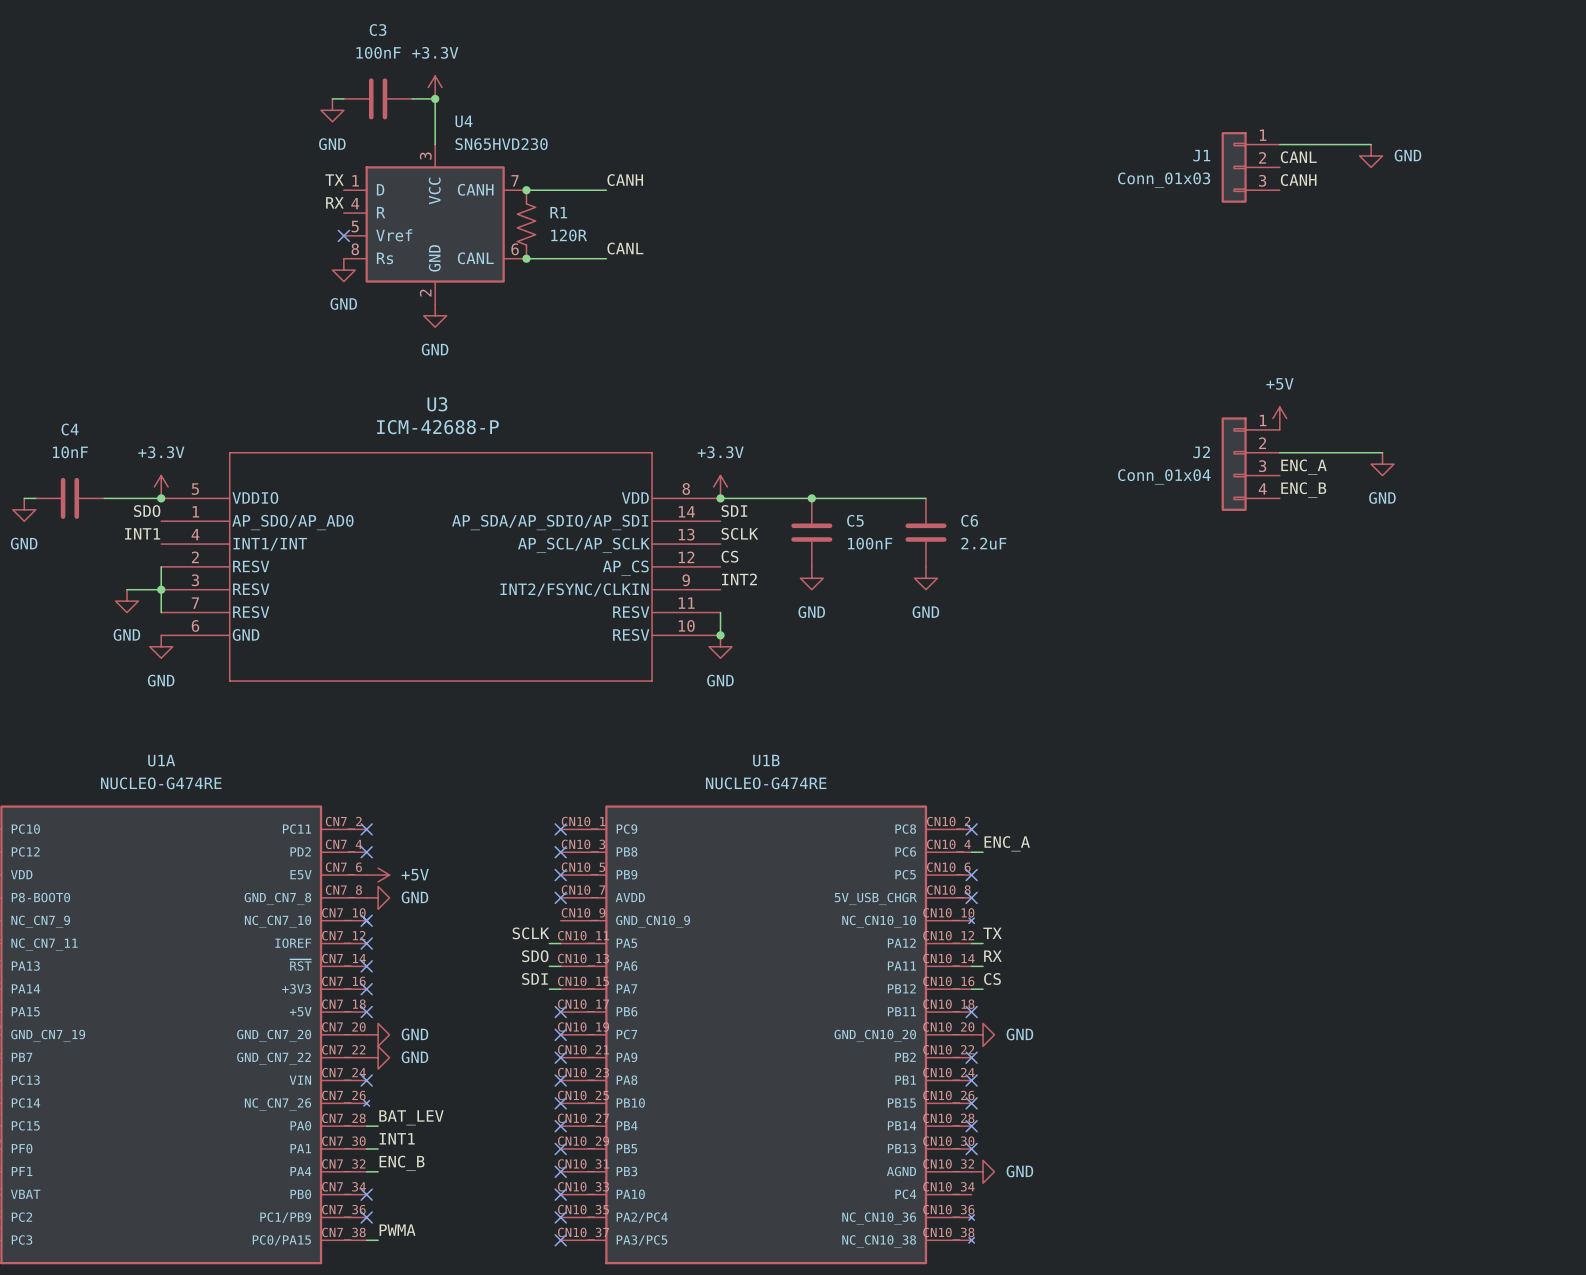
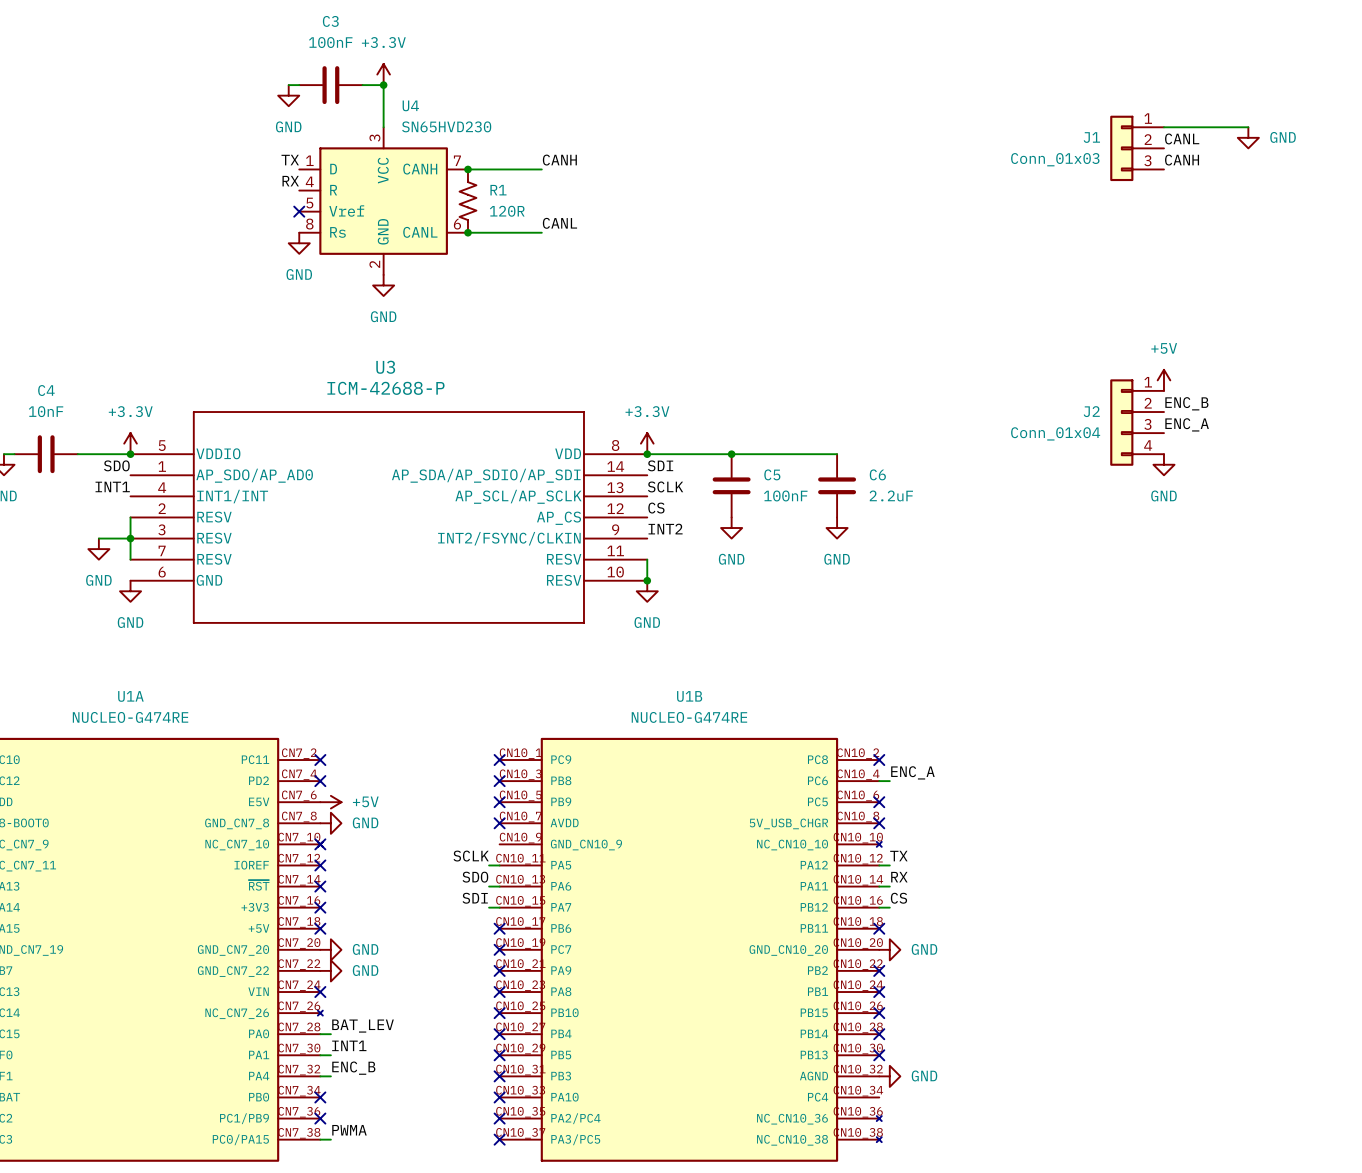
wire: (1279, 452) (1382, 452) -> none
power symbol position: GND (1382, 464) -> GND (1163, 464)
label position: ENC_B (1303, 489) -> ENC_B (1186, 403)

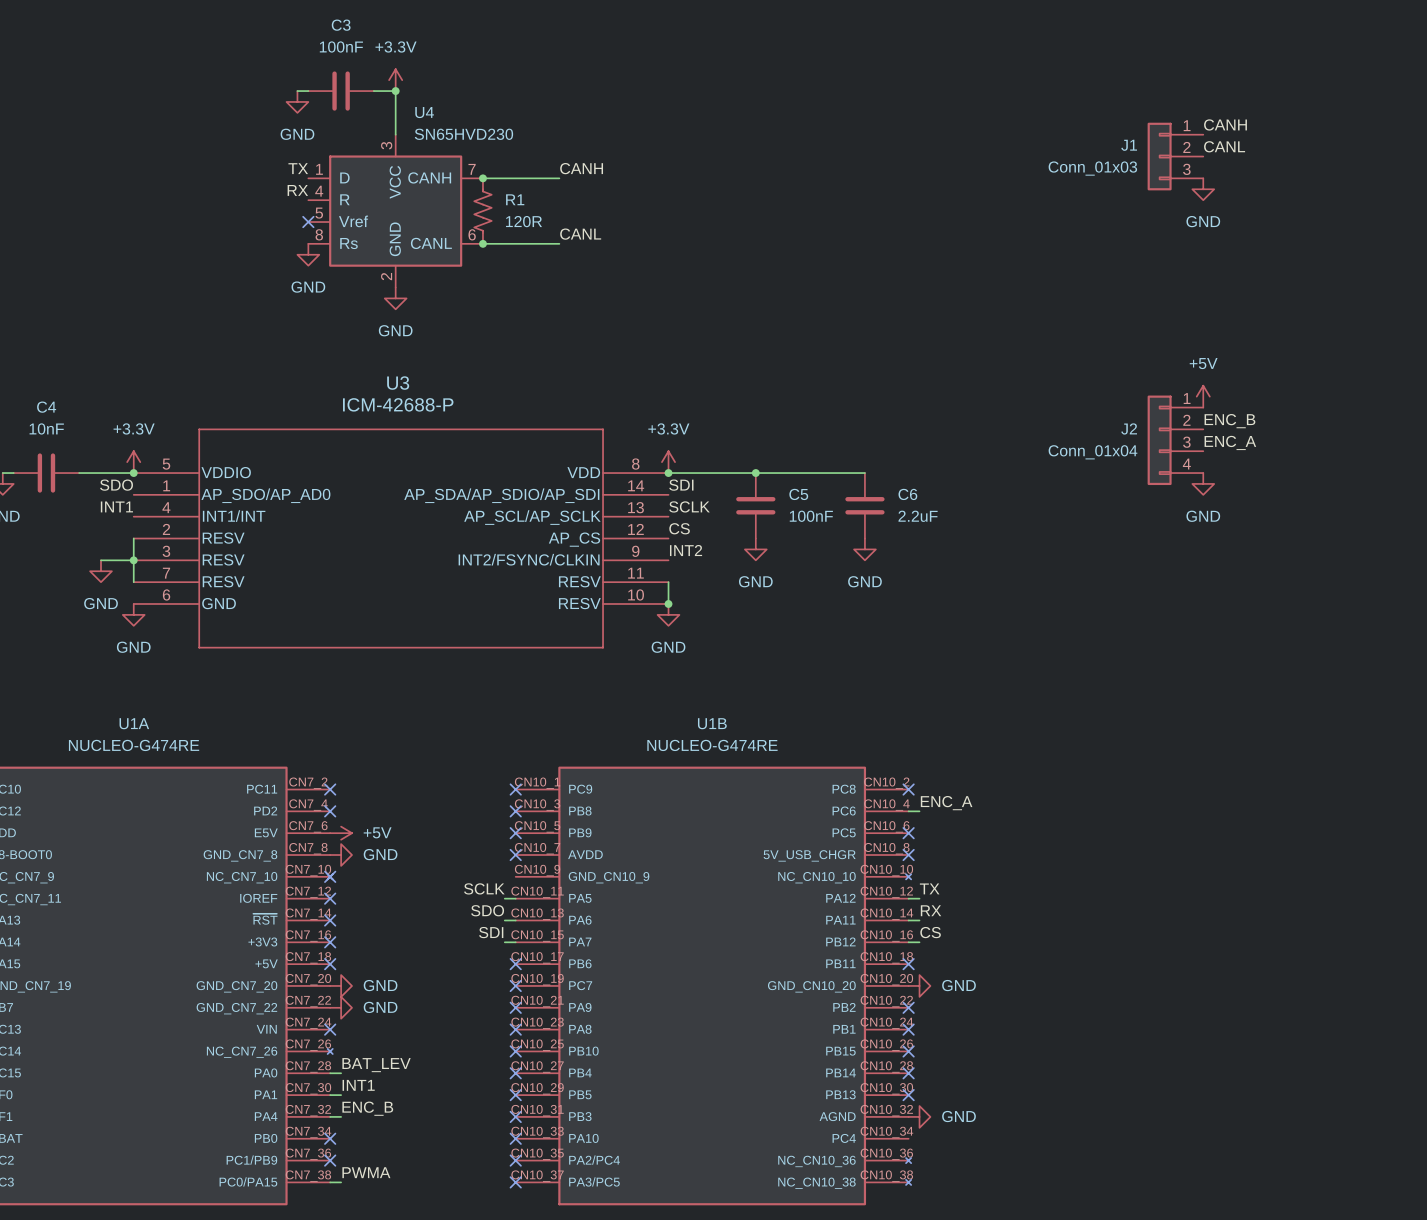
wire: (1163, 127) (1248, 127) -> none
power symbol position: GND (1248, 137) -> GND (1203, 189)
power symbol text position: GND (1283, 137) -> GND (1203, 221)
label position: CANH (1182, 160) -> CANH (1225, 124)

